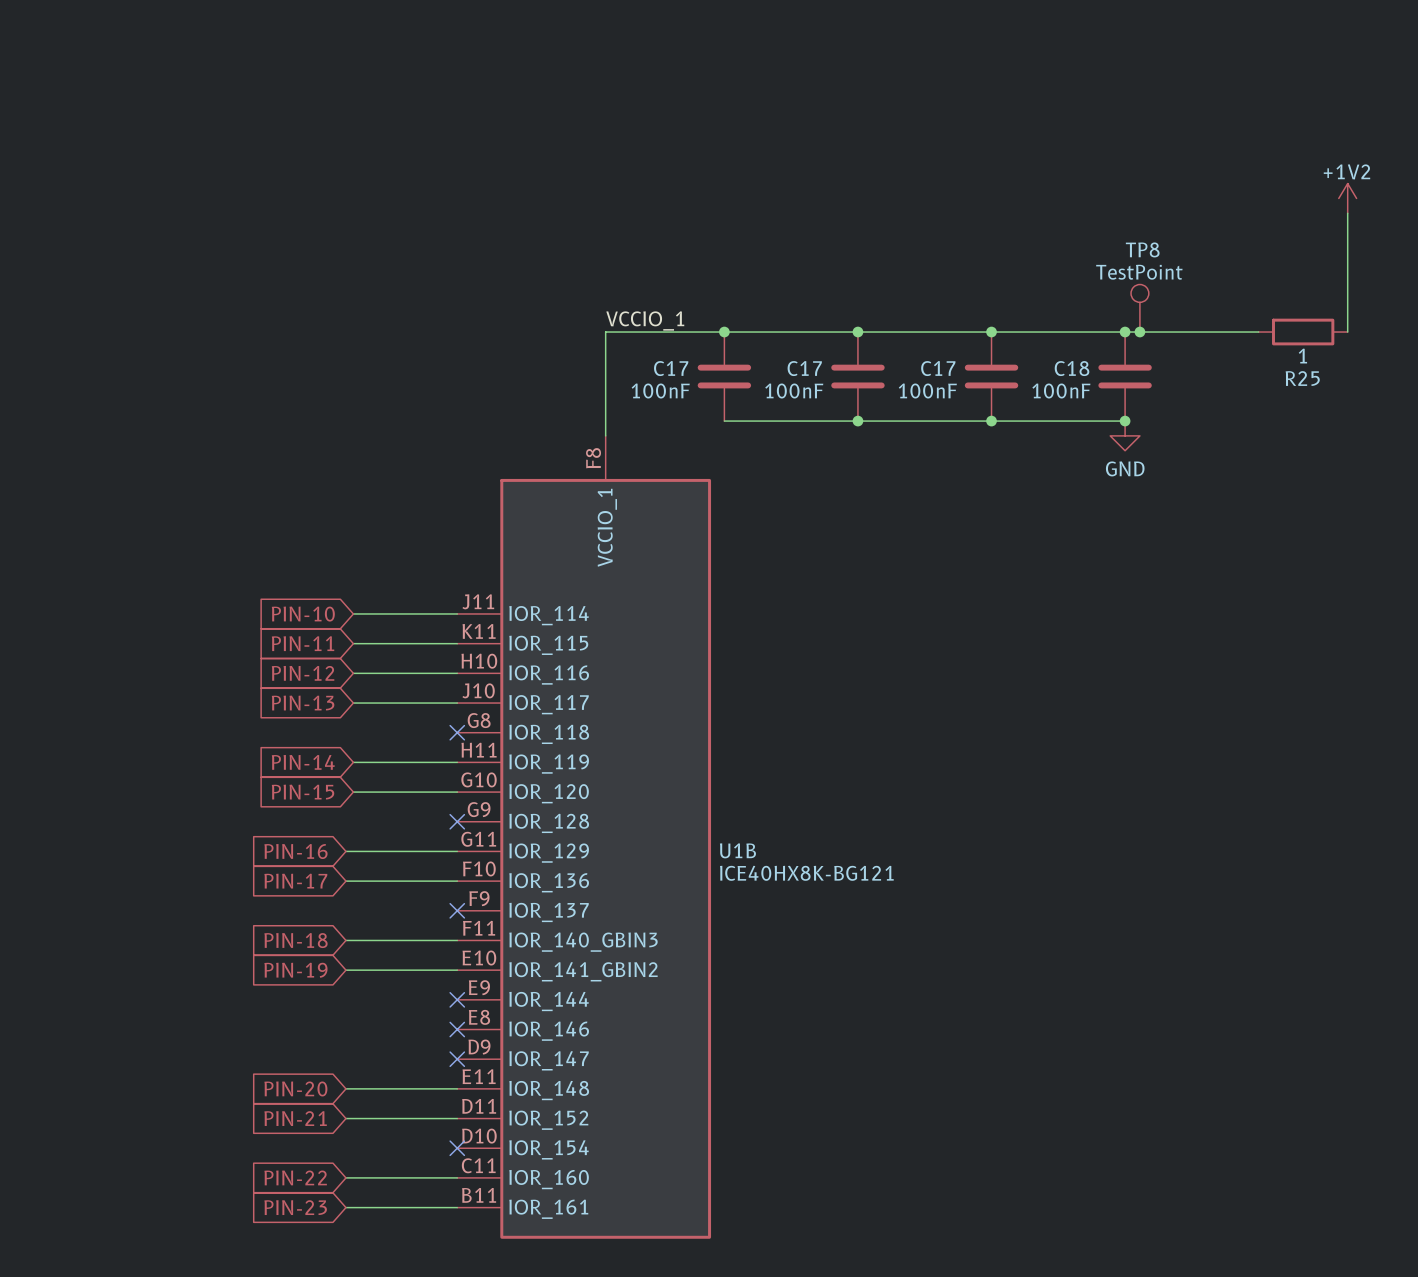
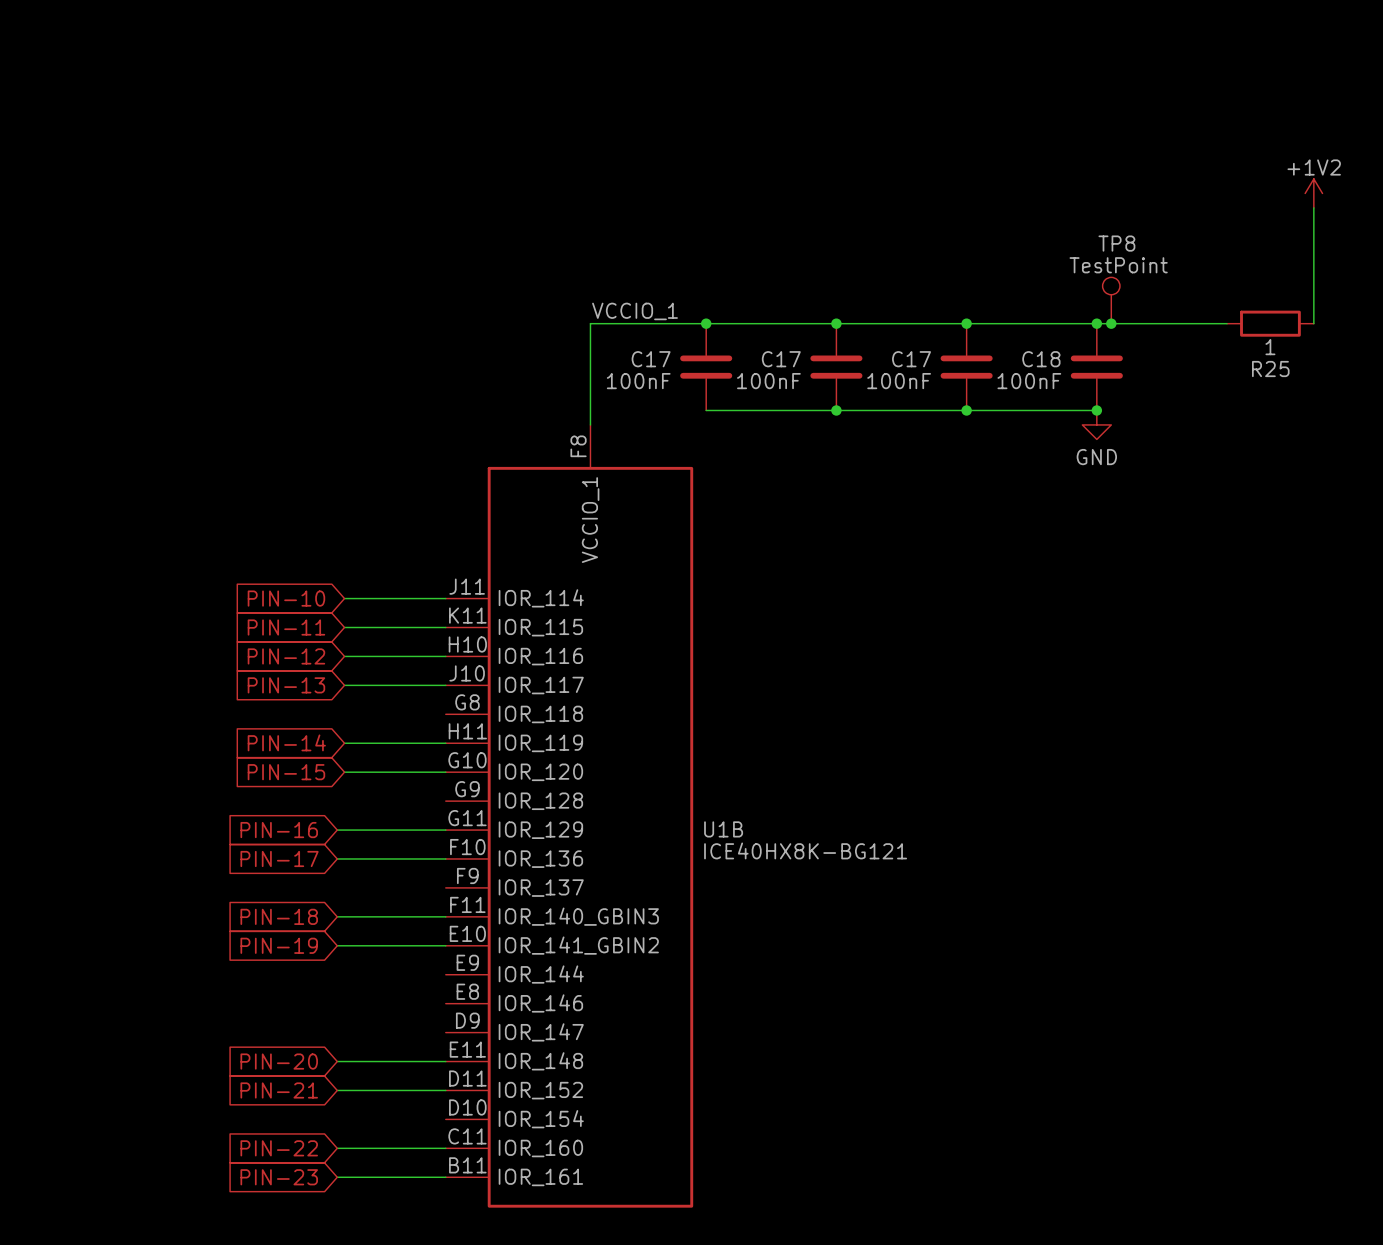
no-connect mark: (457, 732) -> none
no-connect mark: (457, 821) -> none
no-connect mark: (457, 910) -> none
no-connect mark: (457, 999) -> none
no-connect mark: (457, 1029) -> none
no-connect mark: (457, 1059) -> none
no-connect mark: (457, 1148) -> none

